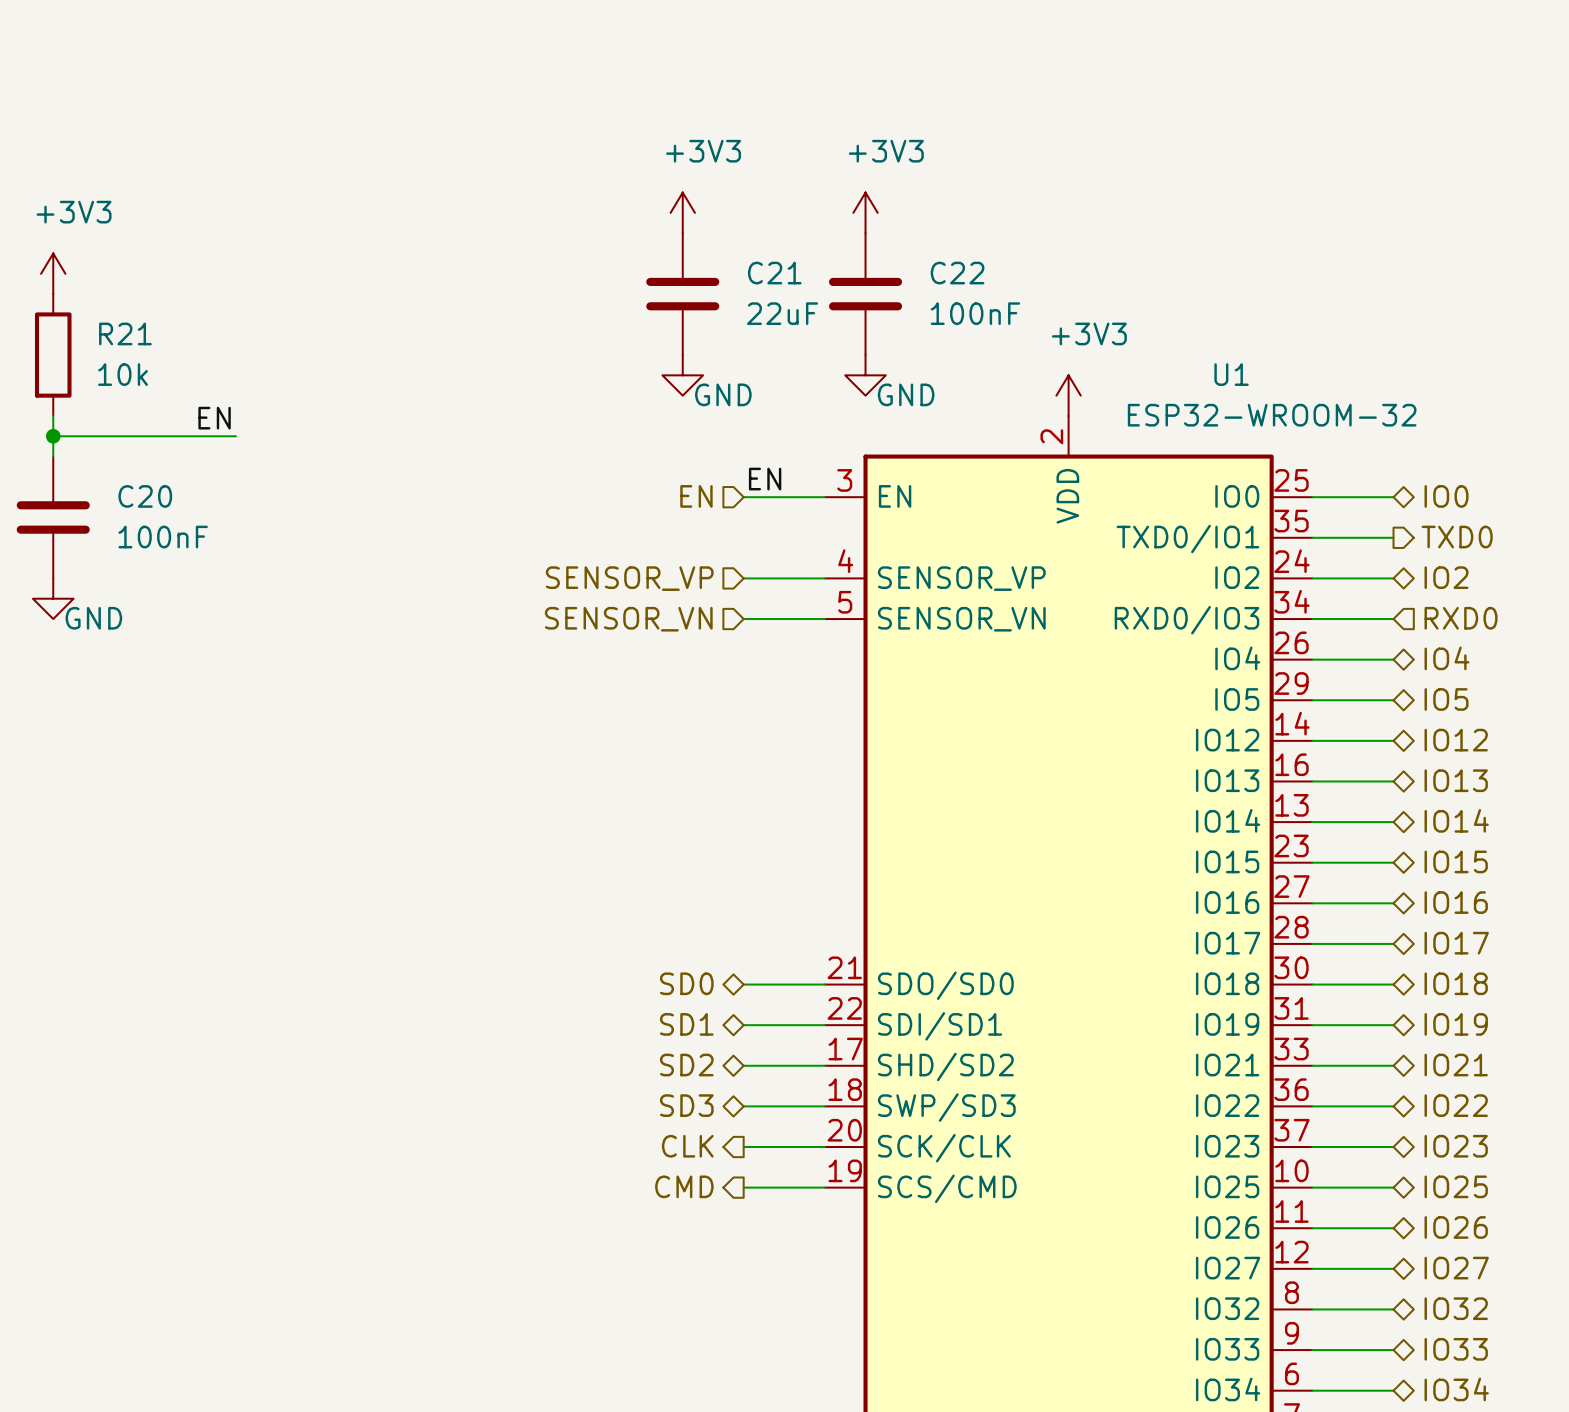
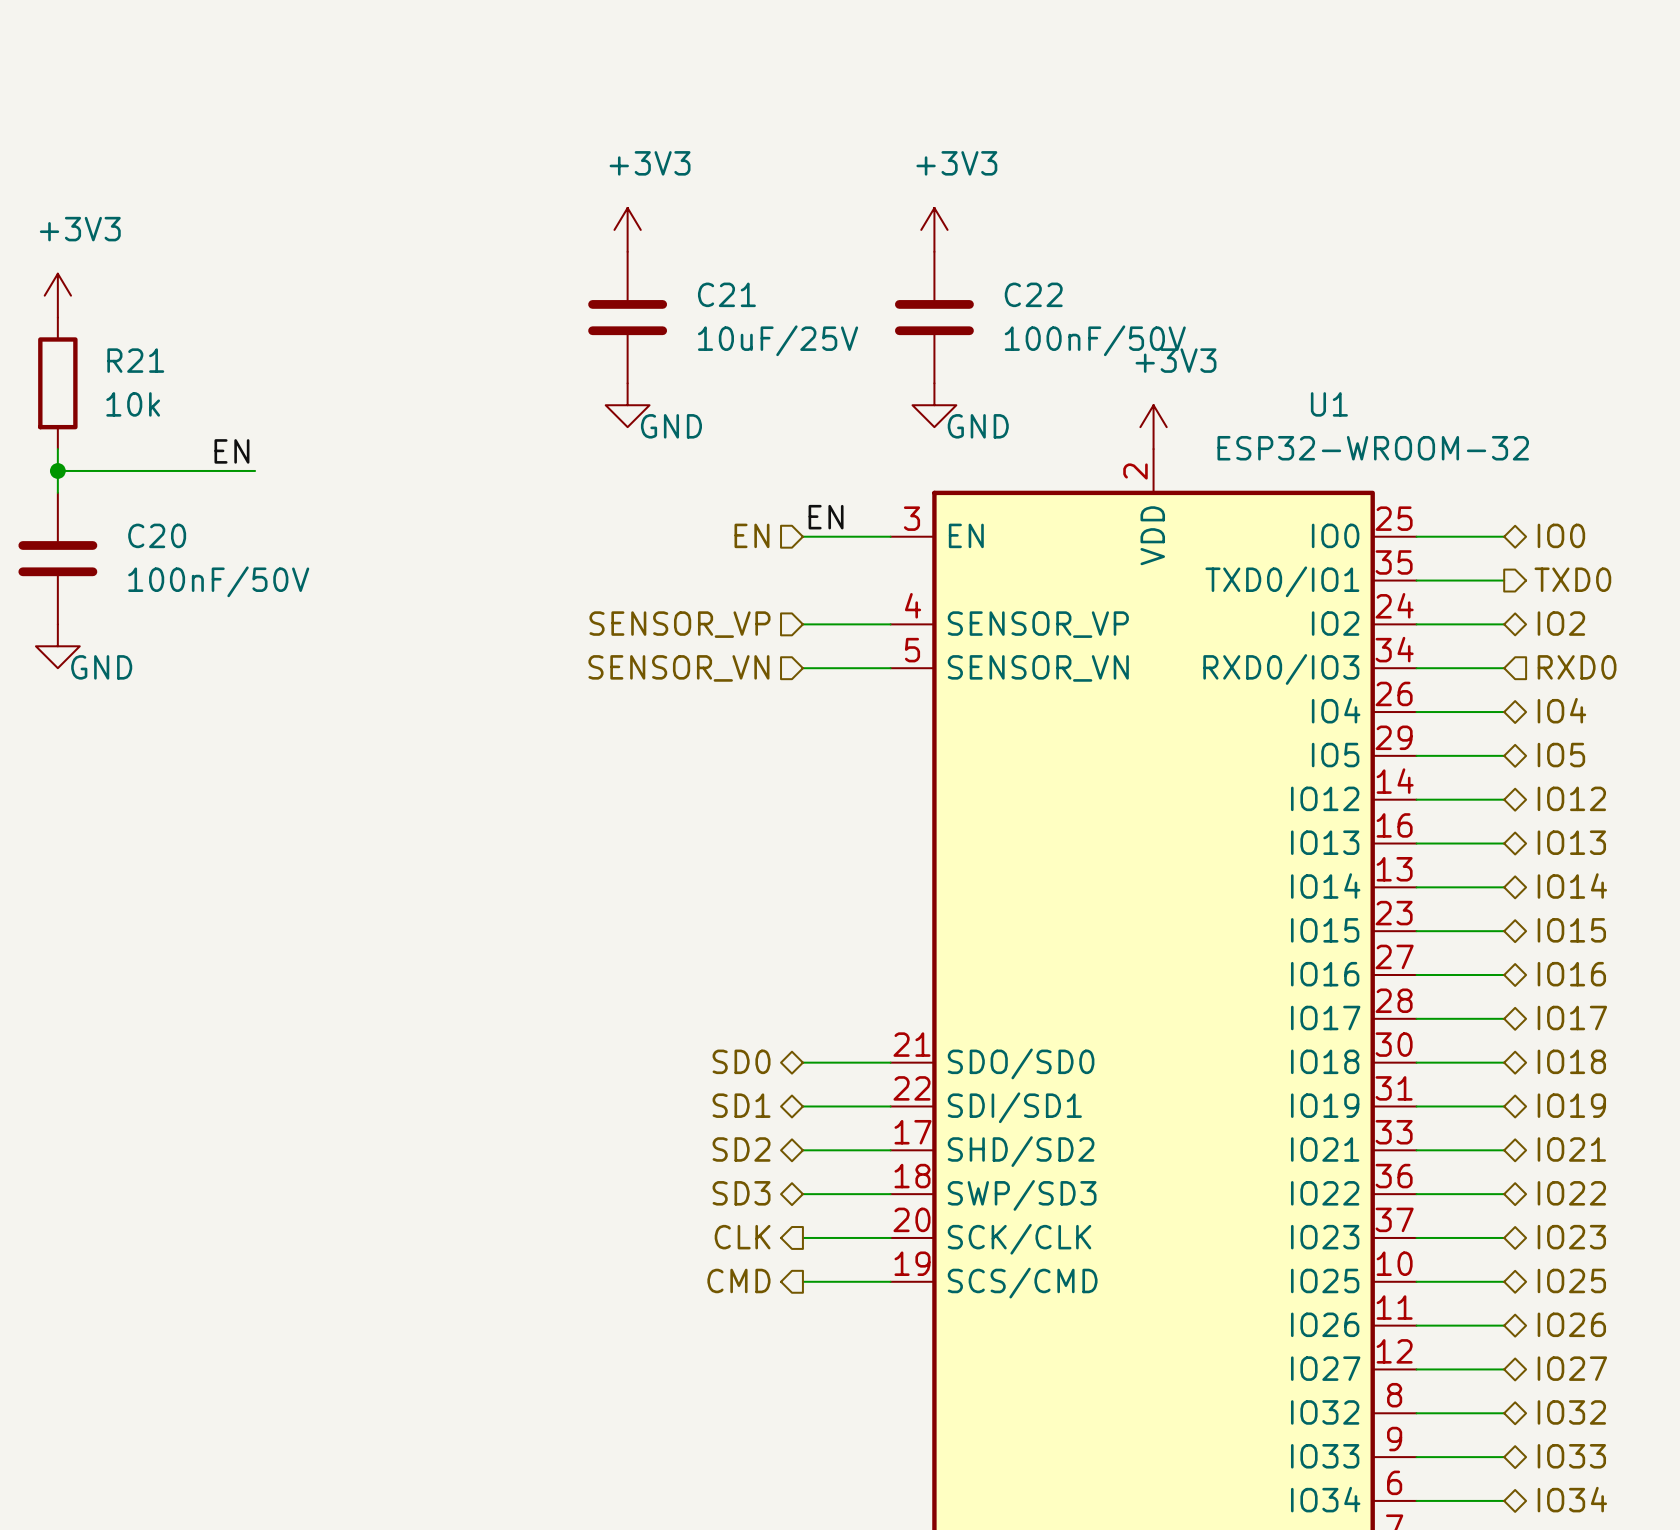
power symbol position: +3V3 (682, 212) -> +3V3 (627, 229)
C21 position: (682, 294) -> (627, 317)
C21 value: 22uF (782, 313) -> 10uF/25V (778, 340)
C22 value: 100nF (975, 313) -> 100nF/50V (1095, 340)
power symbol position: GND (682, 375) -> GND (627, 405)
C20 value: 100nF (163, 537) -> 100nF/50V (218, 581)

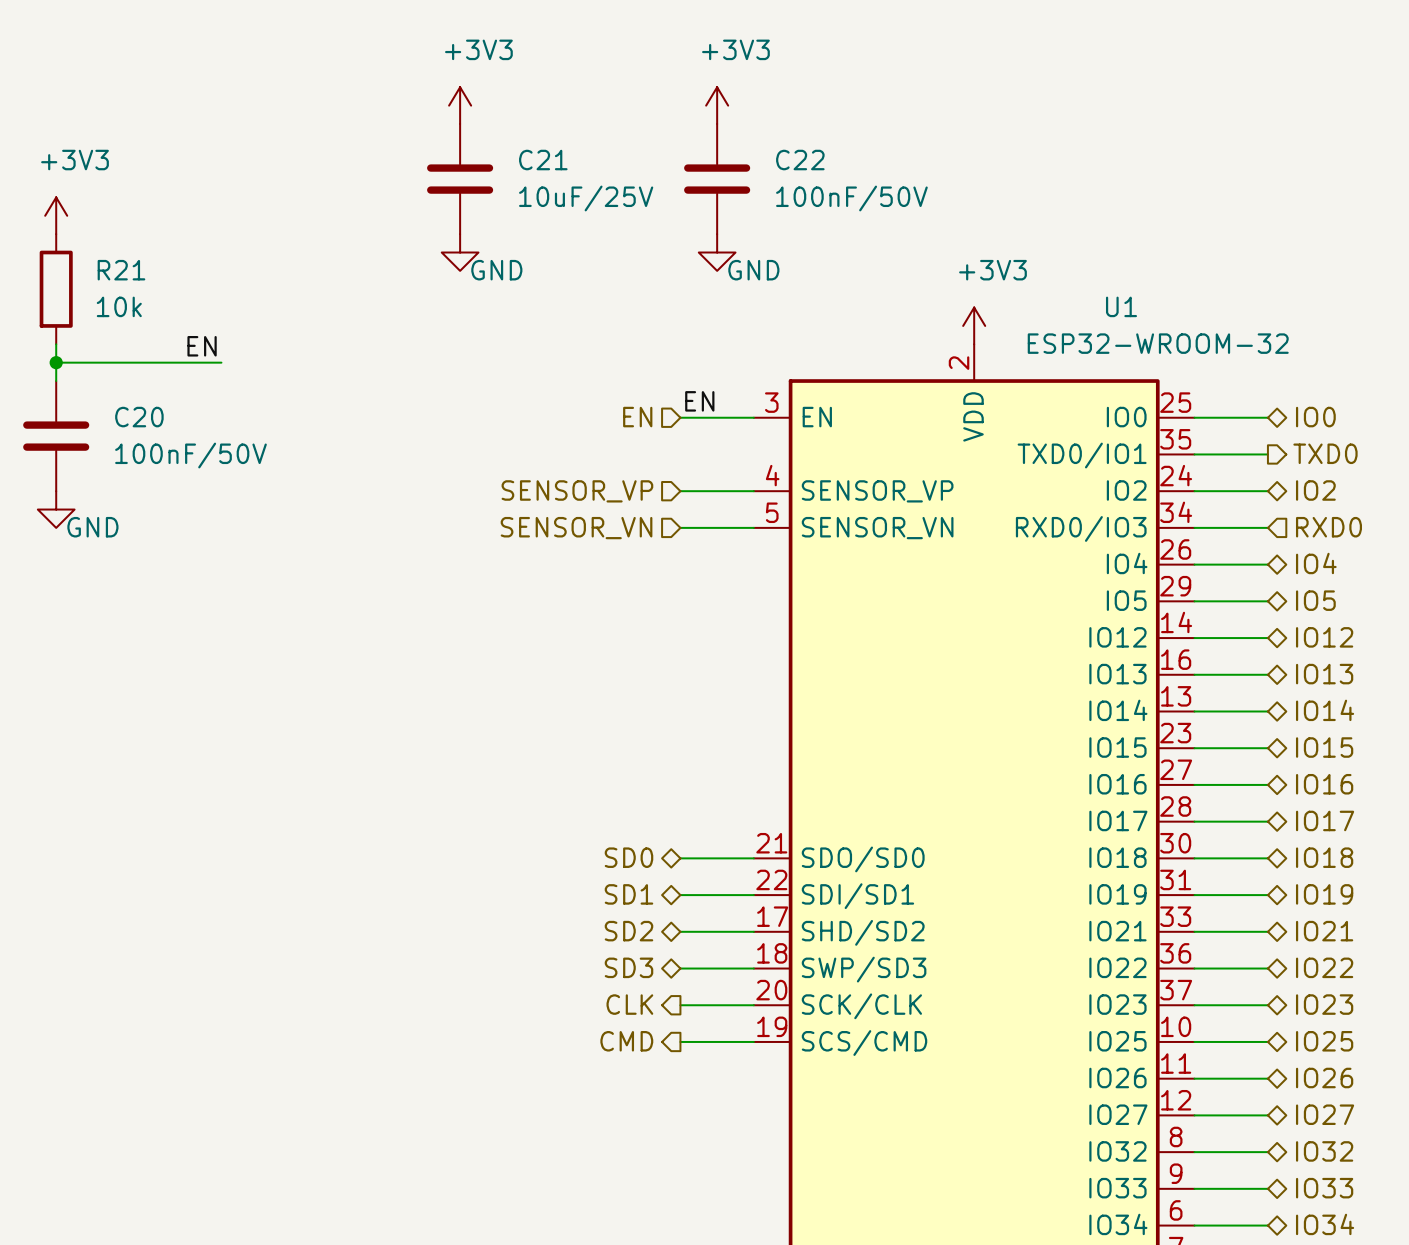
power symbol position: +3V3 (627, 229) -> +3V3 (460, 105)
power symbol position: +3V3 (934, 229) -> +3V3 (717, 105)
C21 position: (627, 317) -> (460, 179)
C22 position: (934, 317) -> (717, 179)
power symbol position: GND (627, 405) -> GND (460, 252)
power symbol position: GND (934, 405) -> GND (717, 252)

